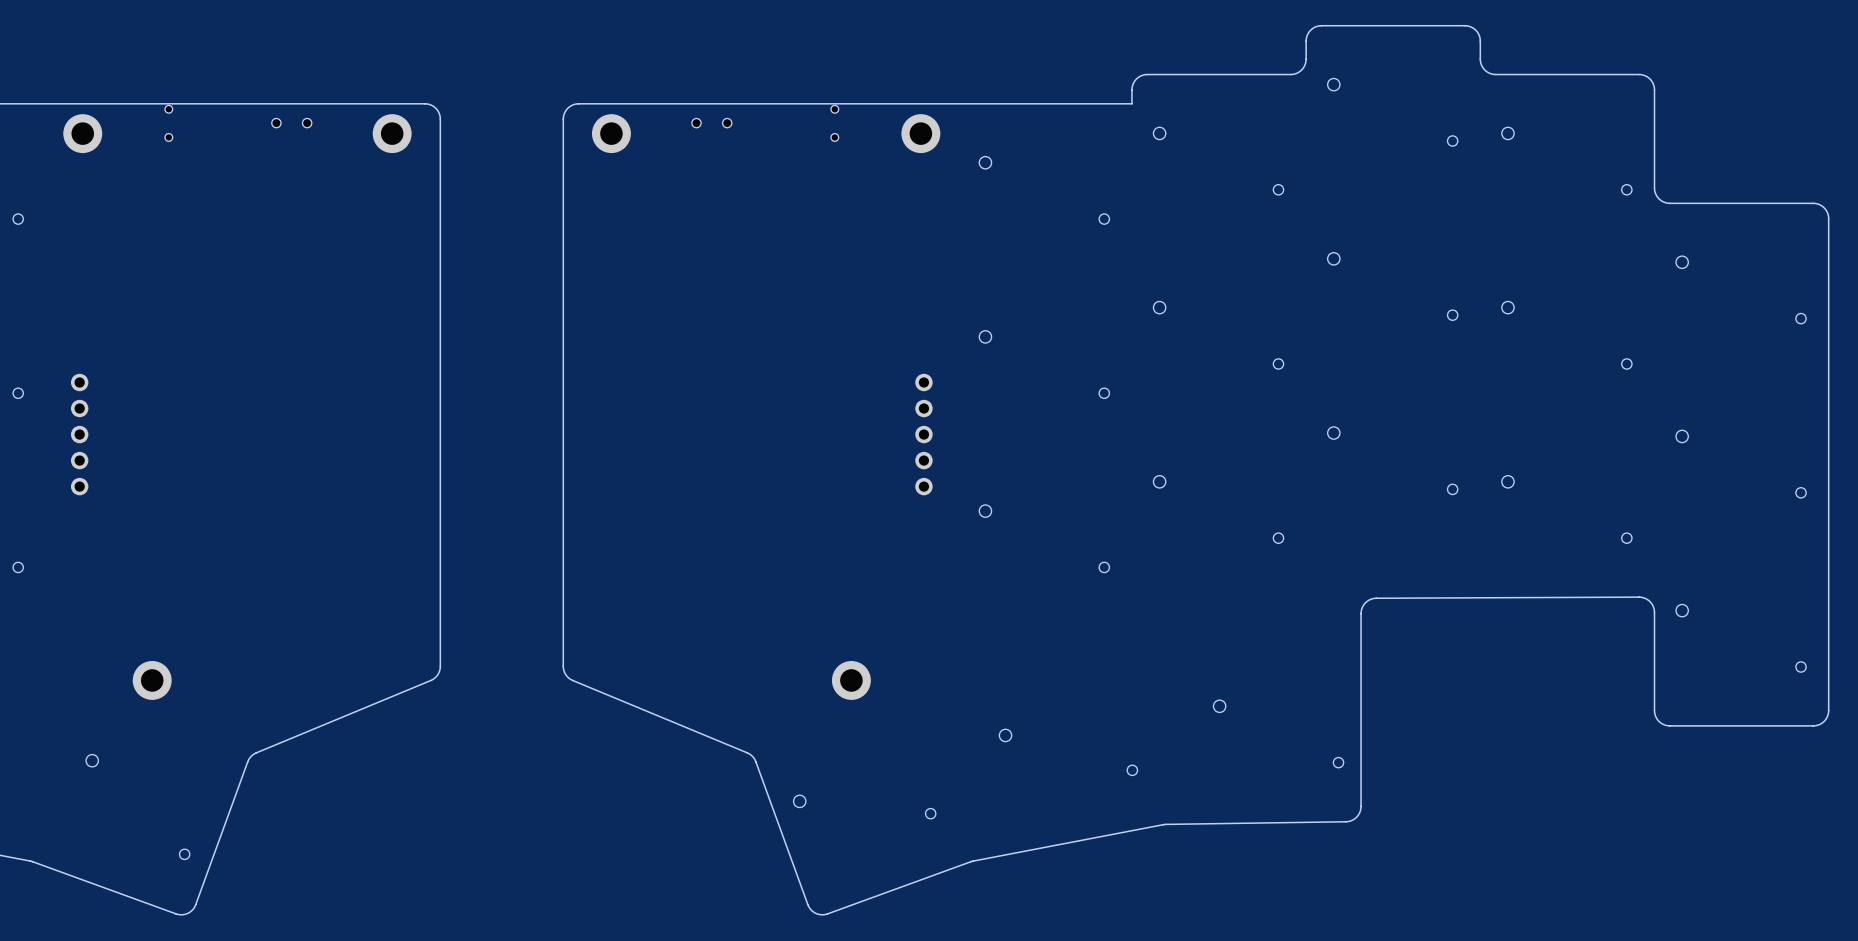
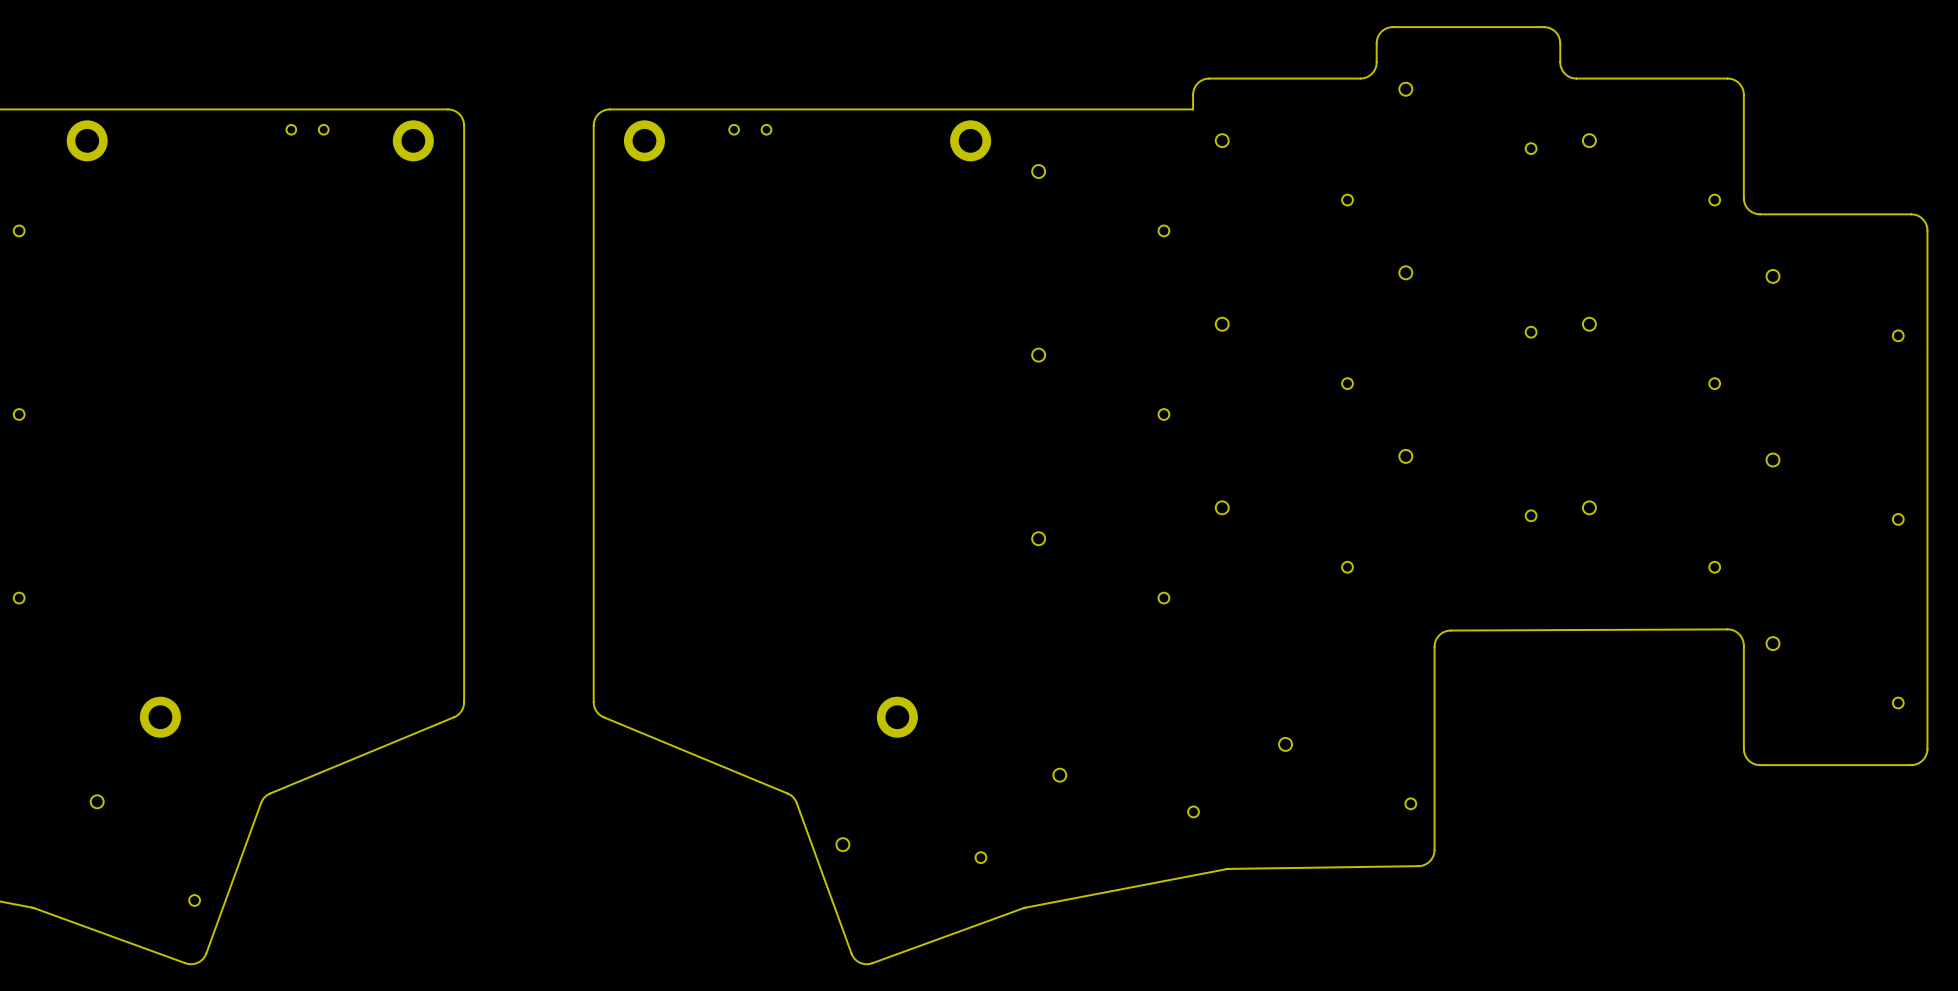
part: (168, 123) -> none
part: (834, 123) -> none
part: (79, 434) -> none
part: (923, 434) -> none

